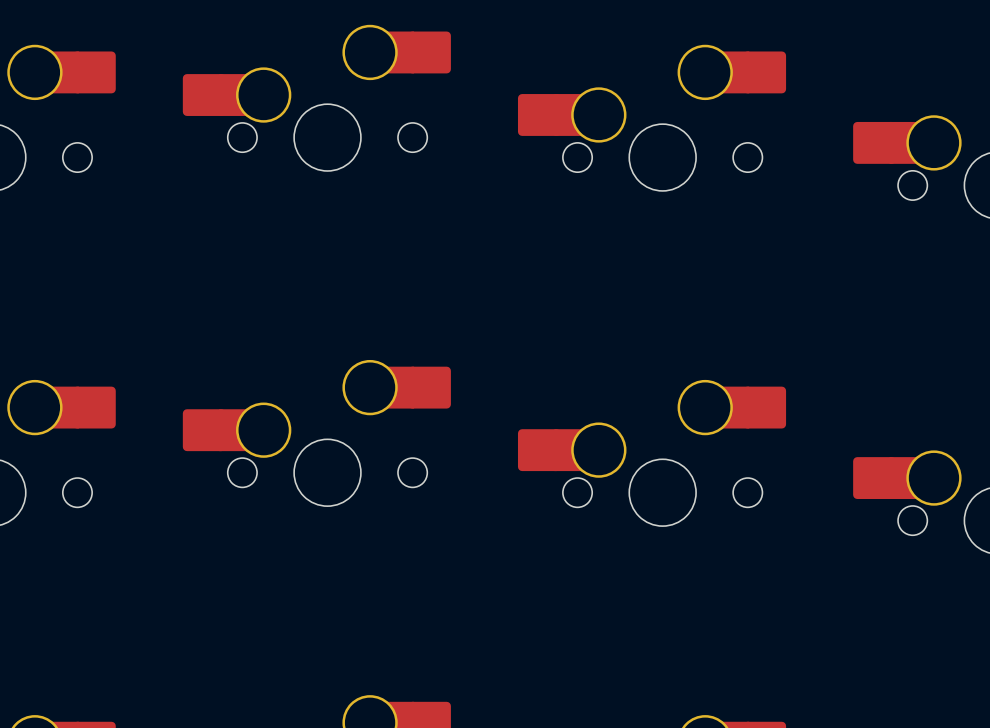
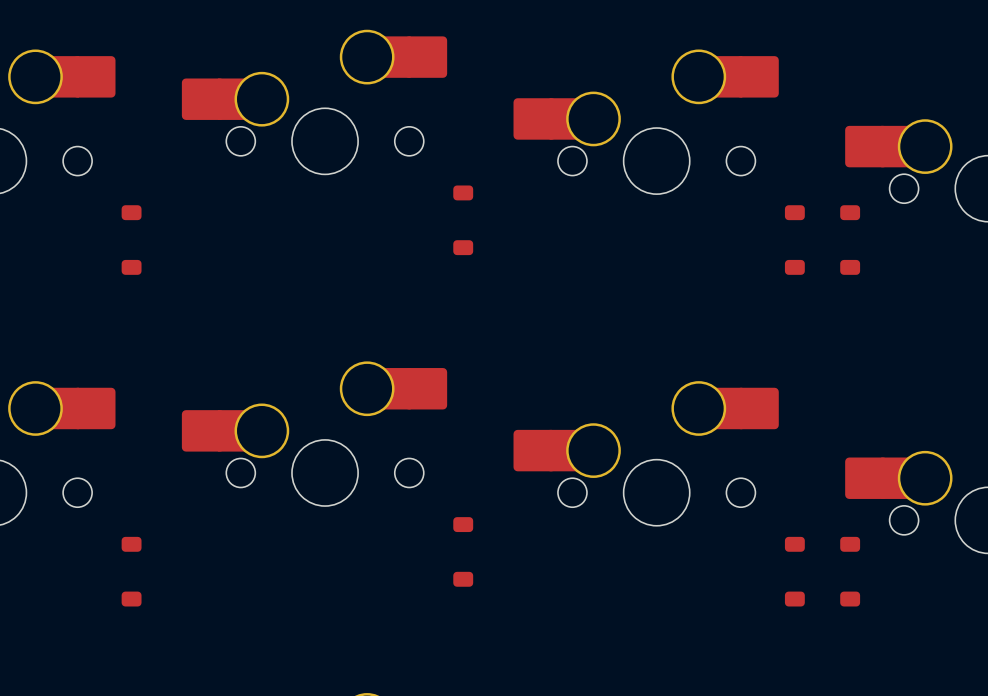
part: none -> (463, 220)
part: none -> (131, 240)
part: none -> (794, 240)
part: none -> (850, 240)
part: none -> (463, 551)
part: none -> (131, 571)
part: none -> (794, 571)
part: none -> (850, 571)

